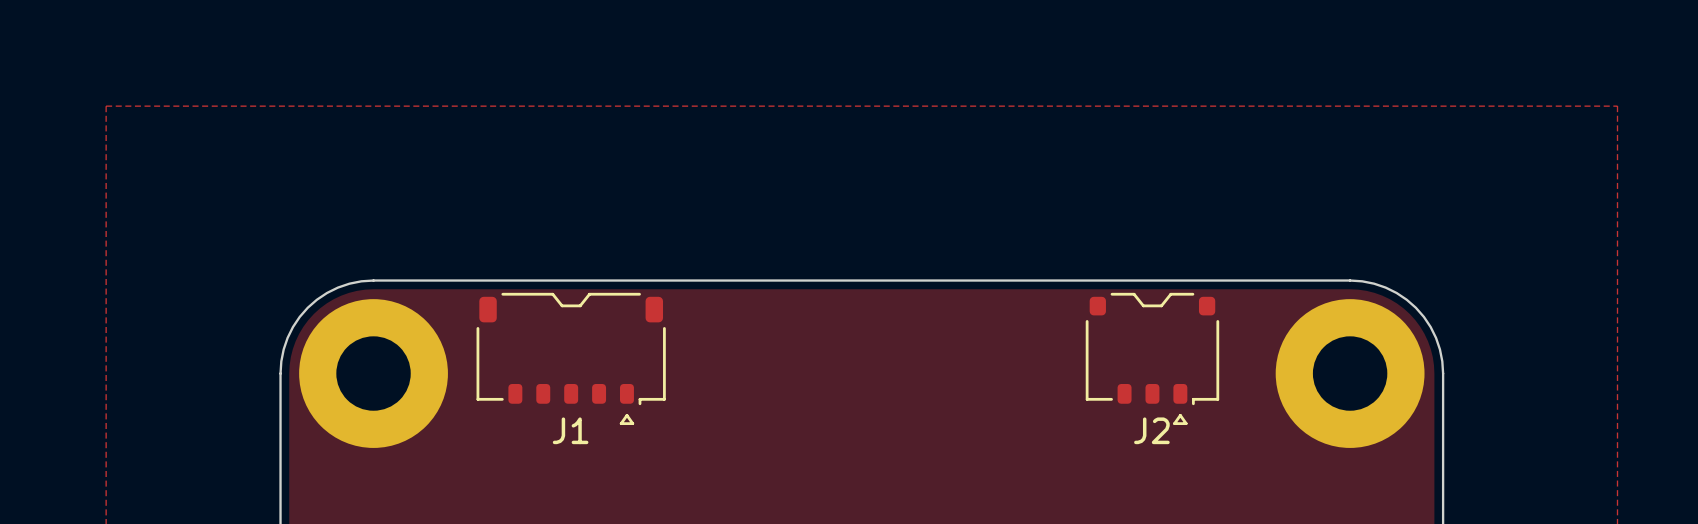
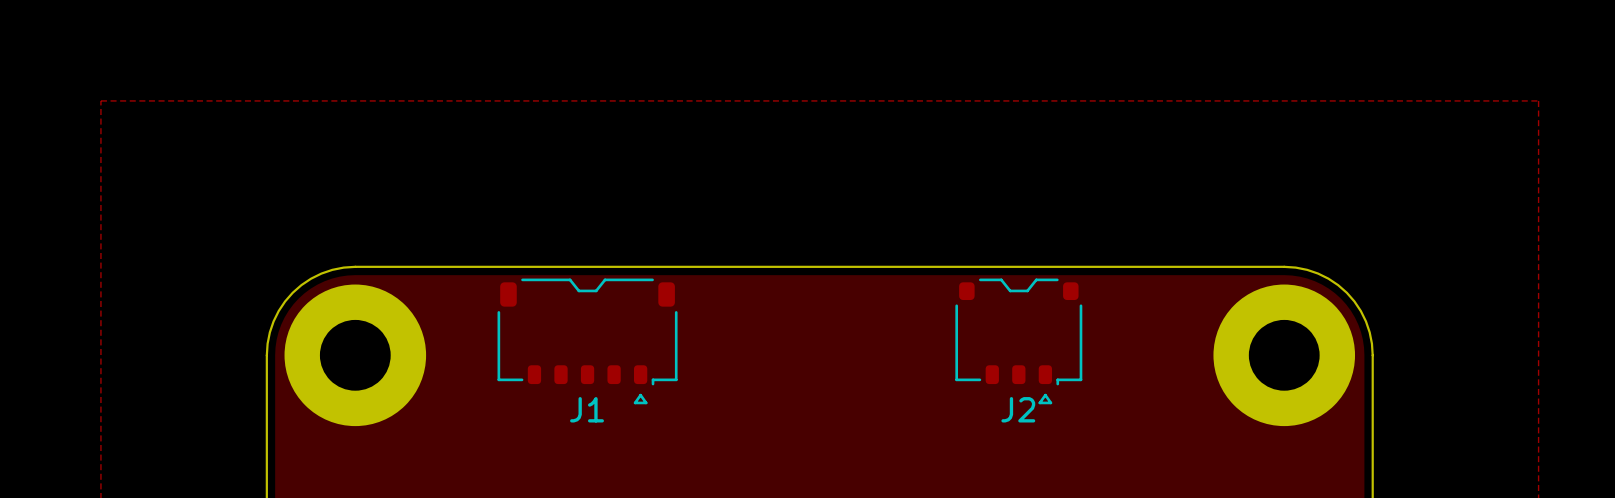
J1 position: (571, 358) -> (587, 341)
J2 position: (1152, 358) -> (1018, 341)

